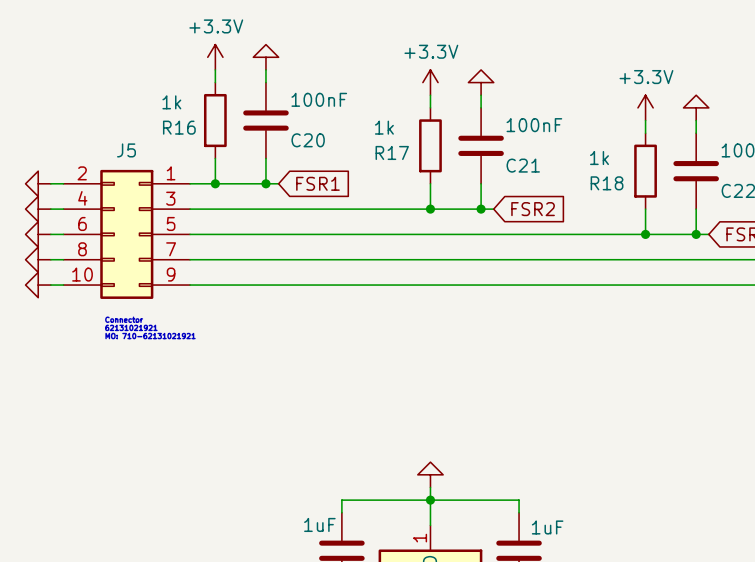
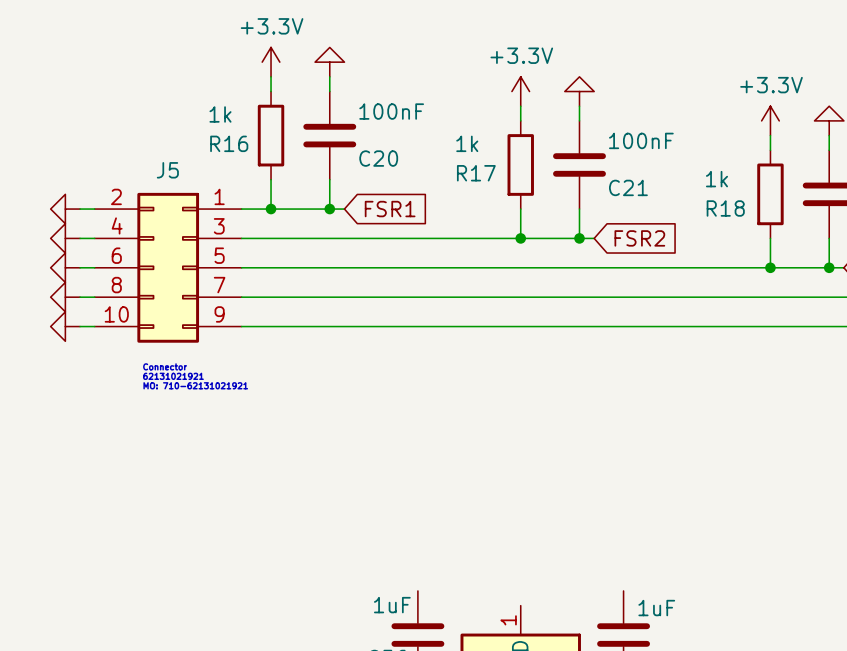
power symbol: (430, 474) -> none
wire: (430, 487) (430, 525) -> none
junction: (430, 500) -> none
wire: (341, 512) (341, 500) (519, 500) (519, 512) -> none

